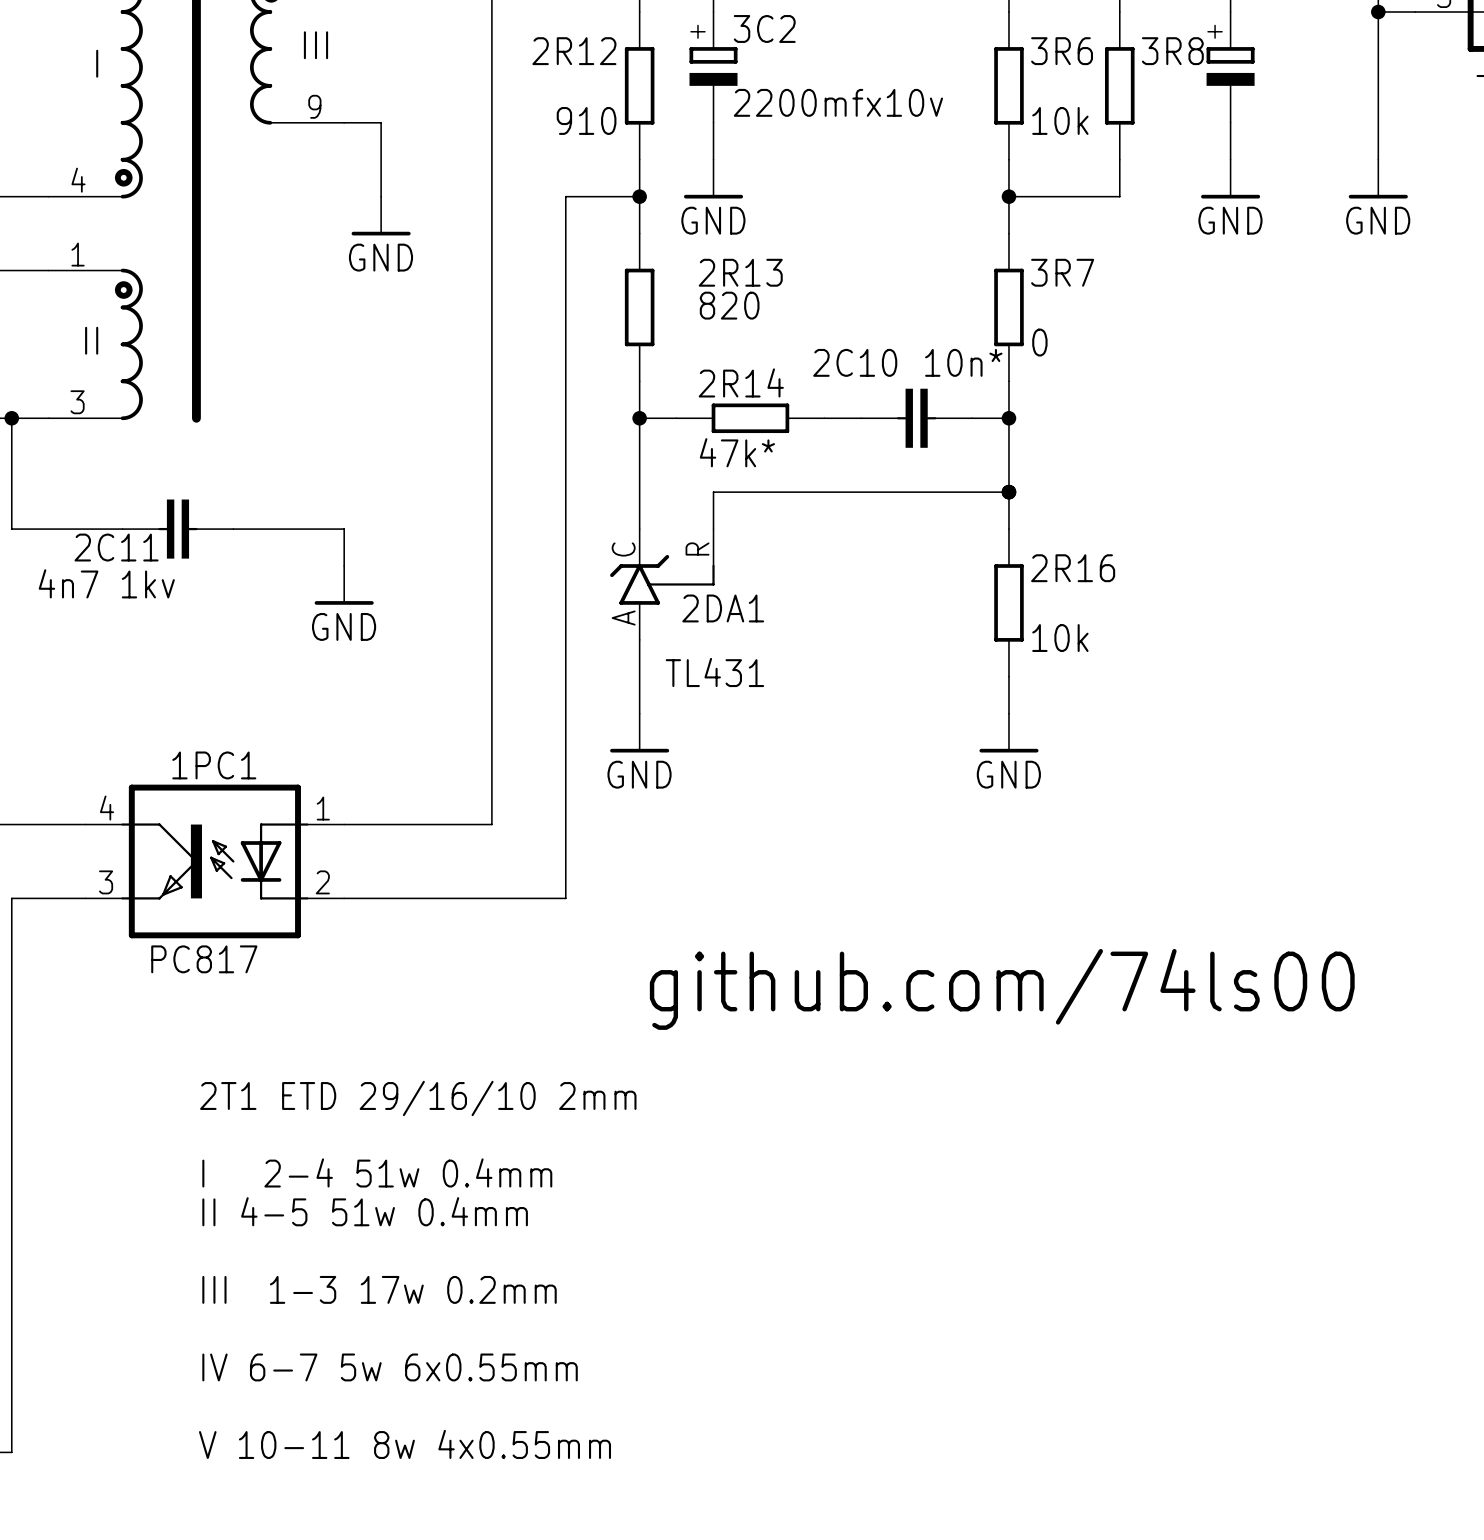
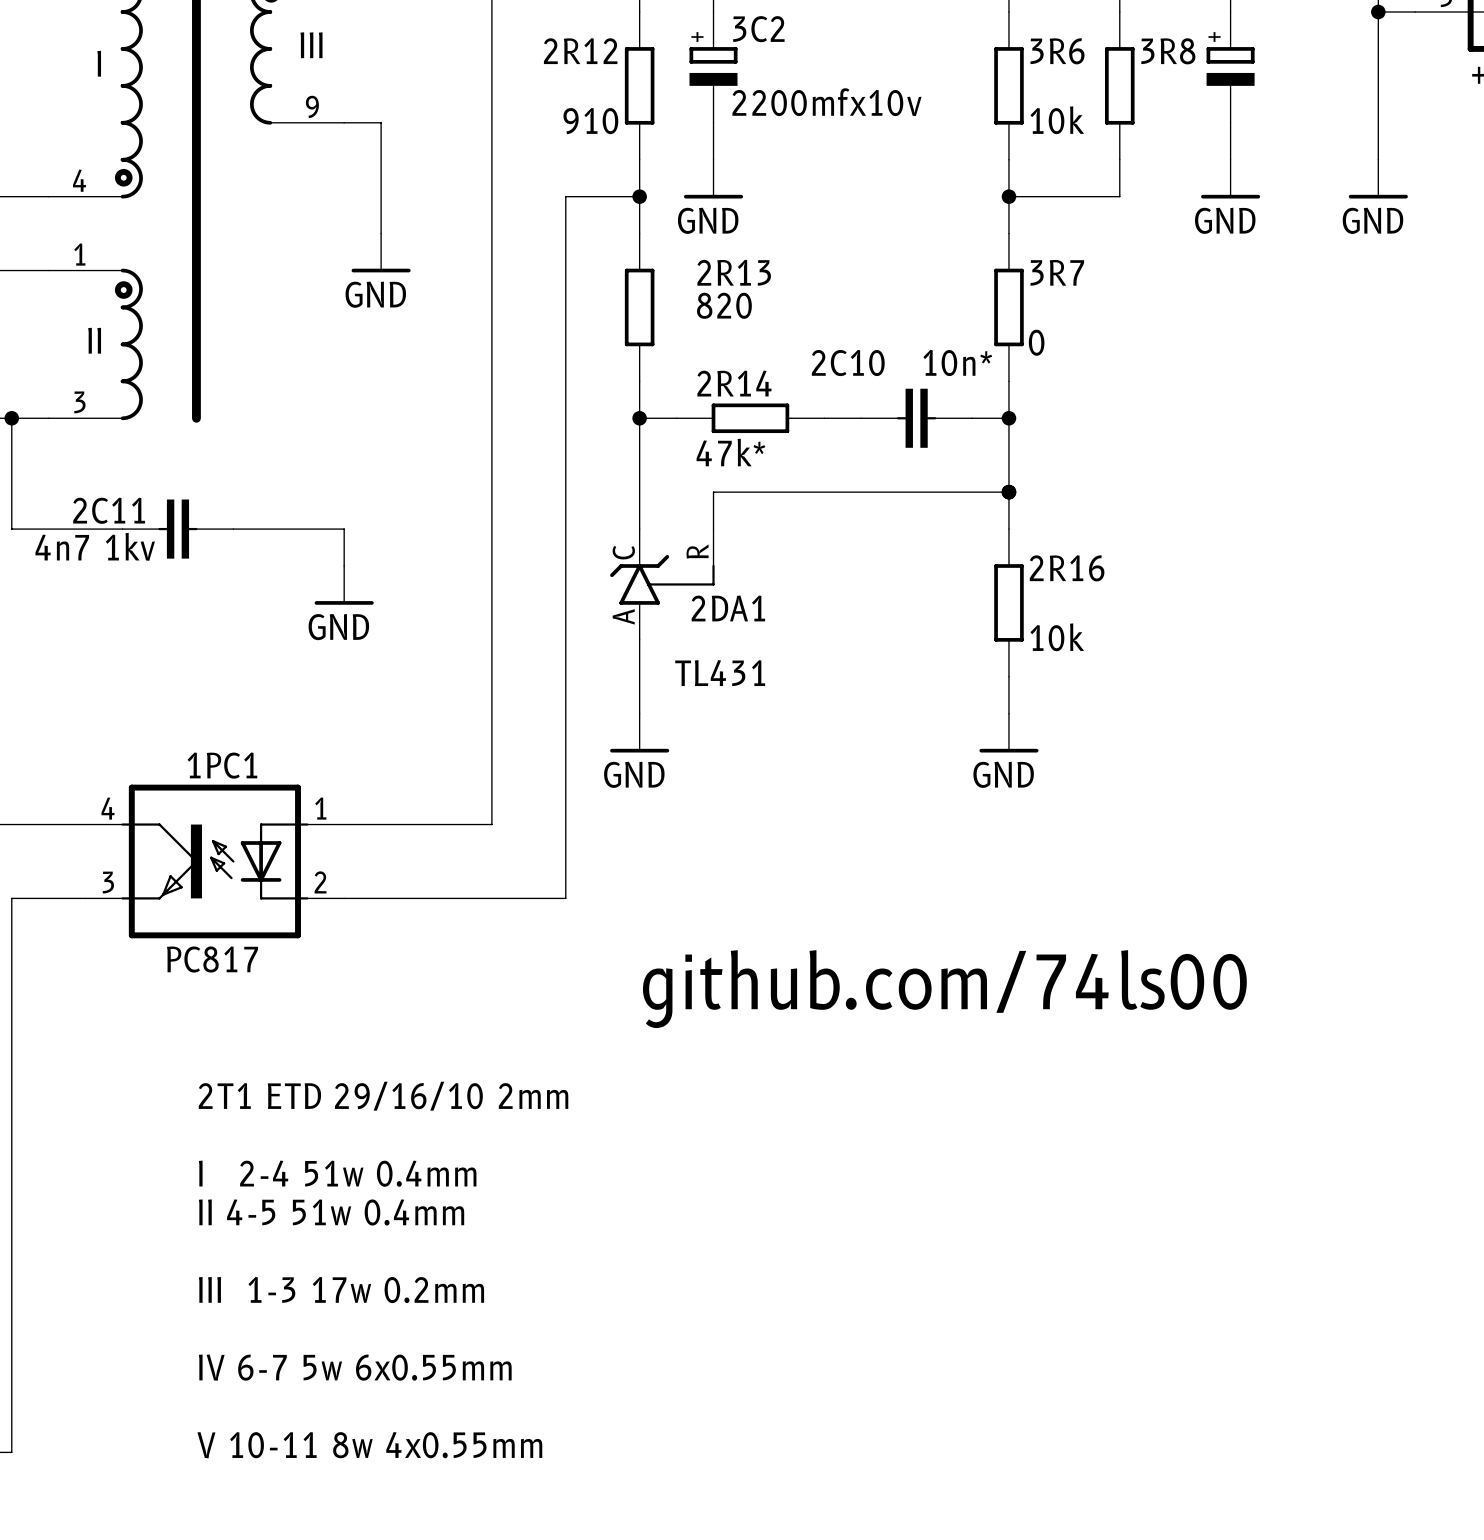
power symbol position: GND (381, 216) -> GND (381, 252)
2C11 name position: 2C11 (116, 547) -> 2C11 (109, 510)
2C11 value position: 4n7 1kv (106, 583) -> 4n7 1kv (95, 546)

